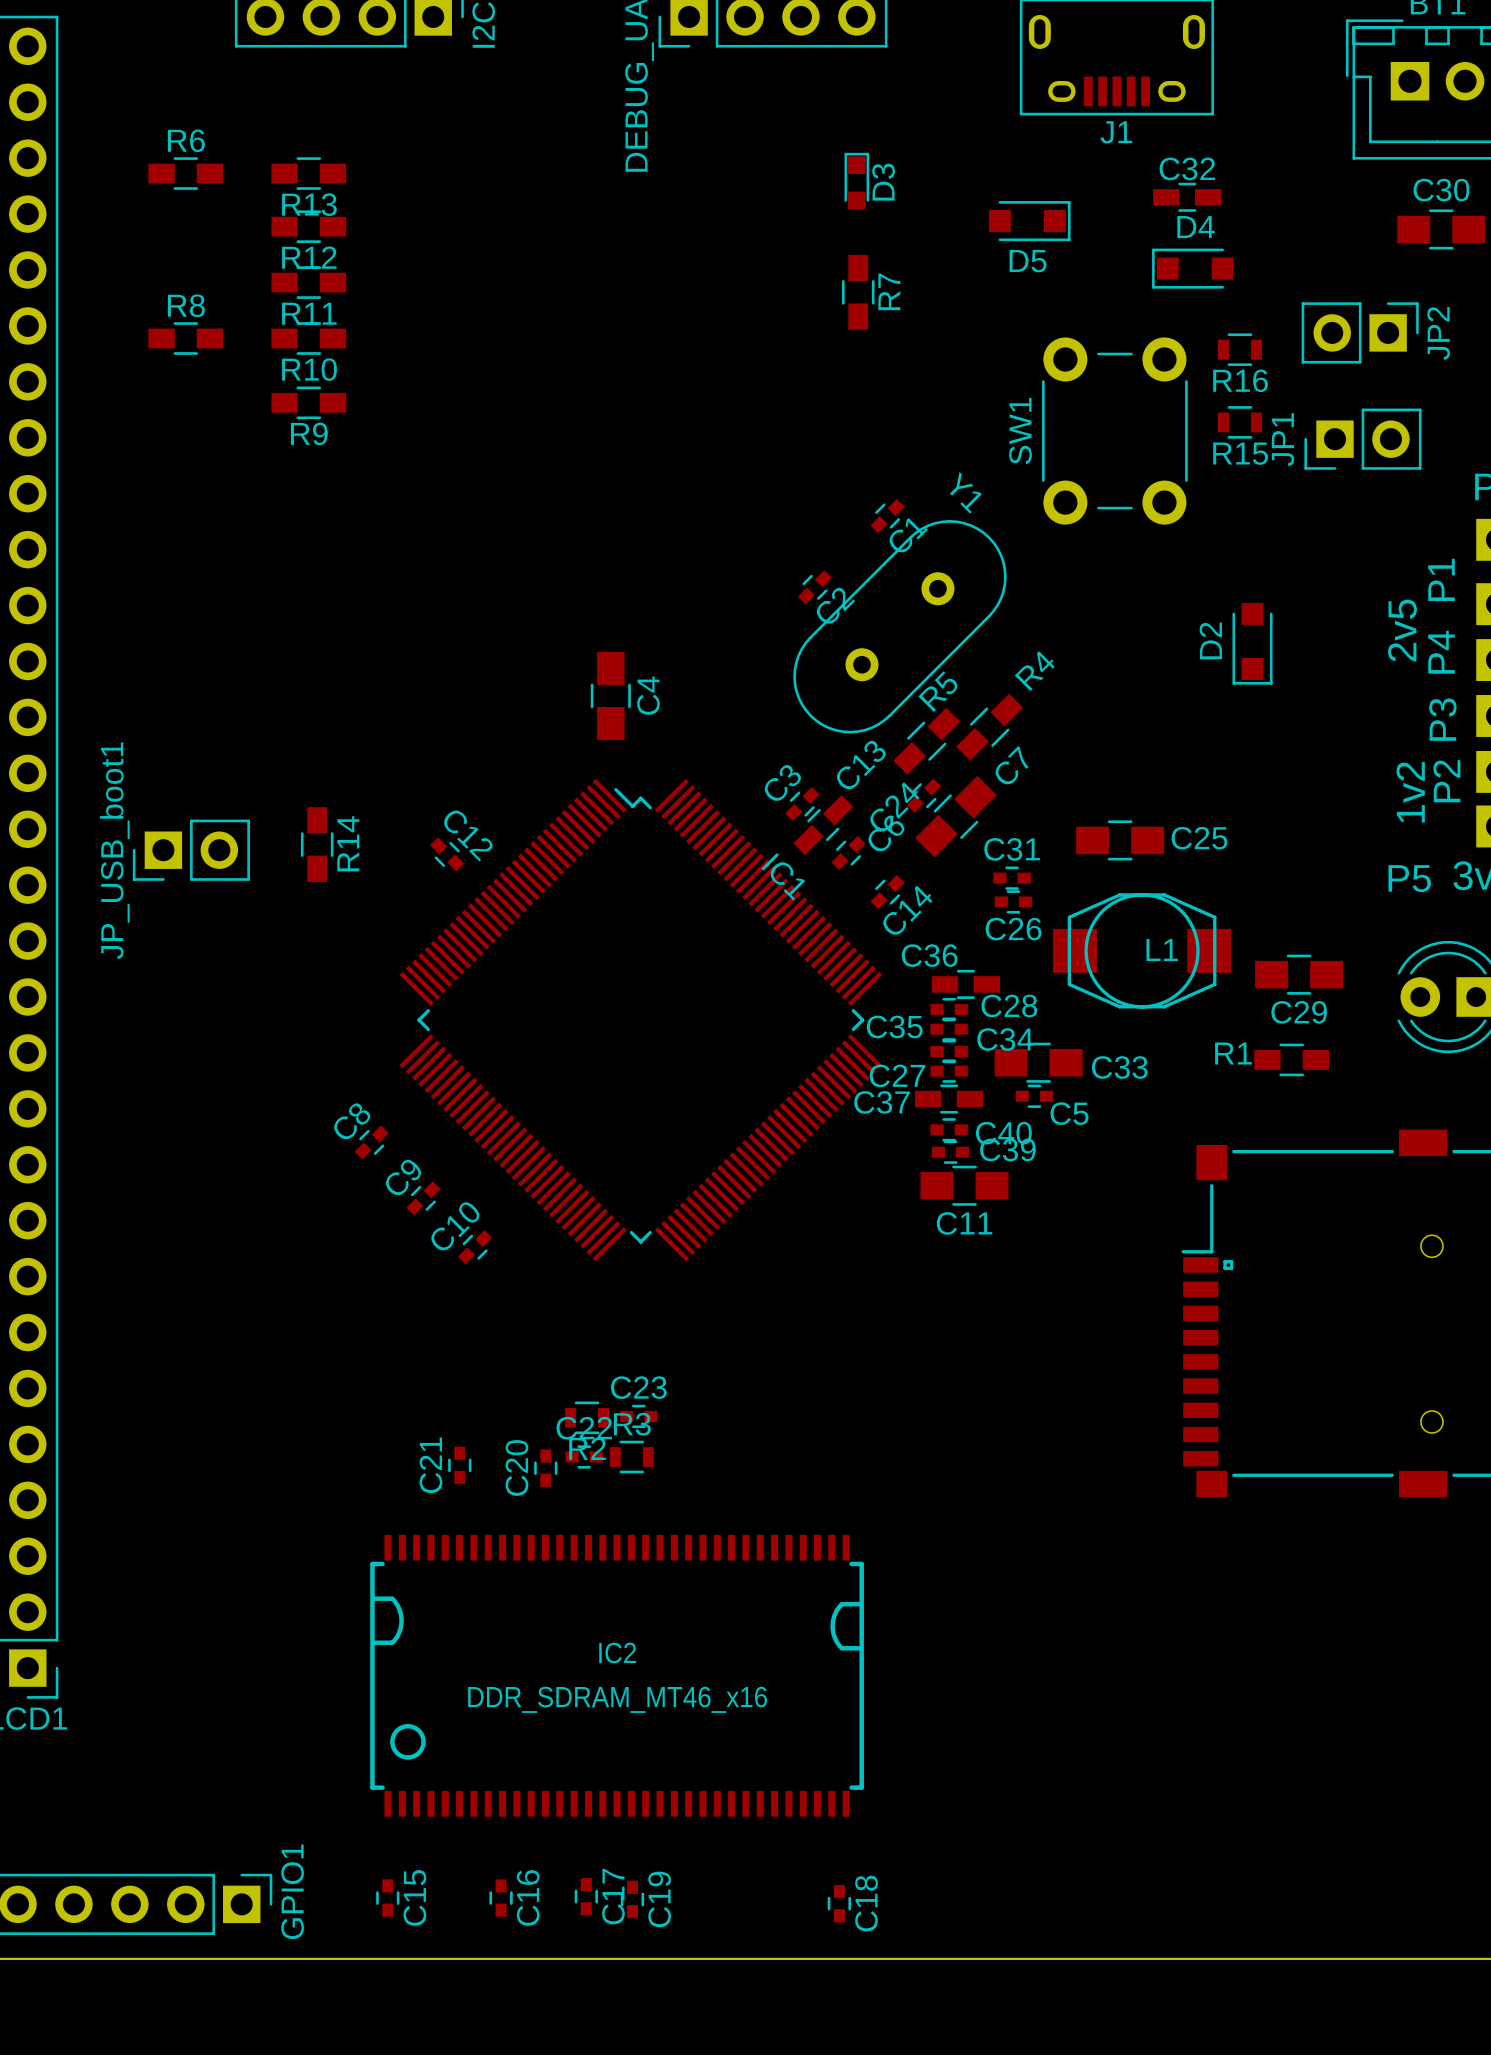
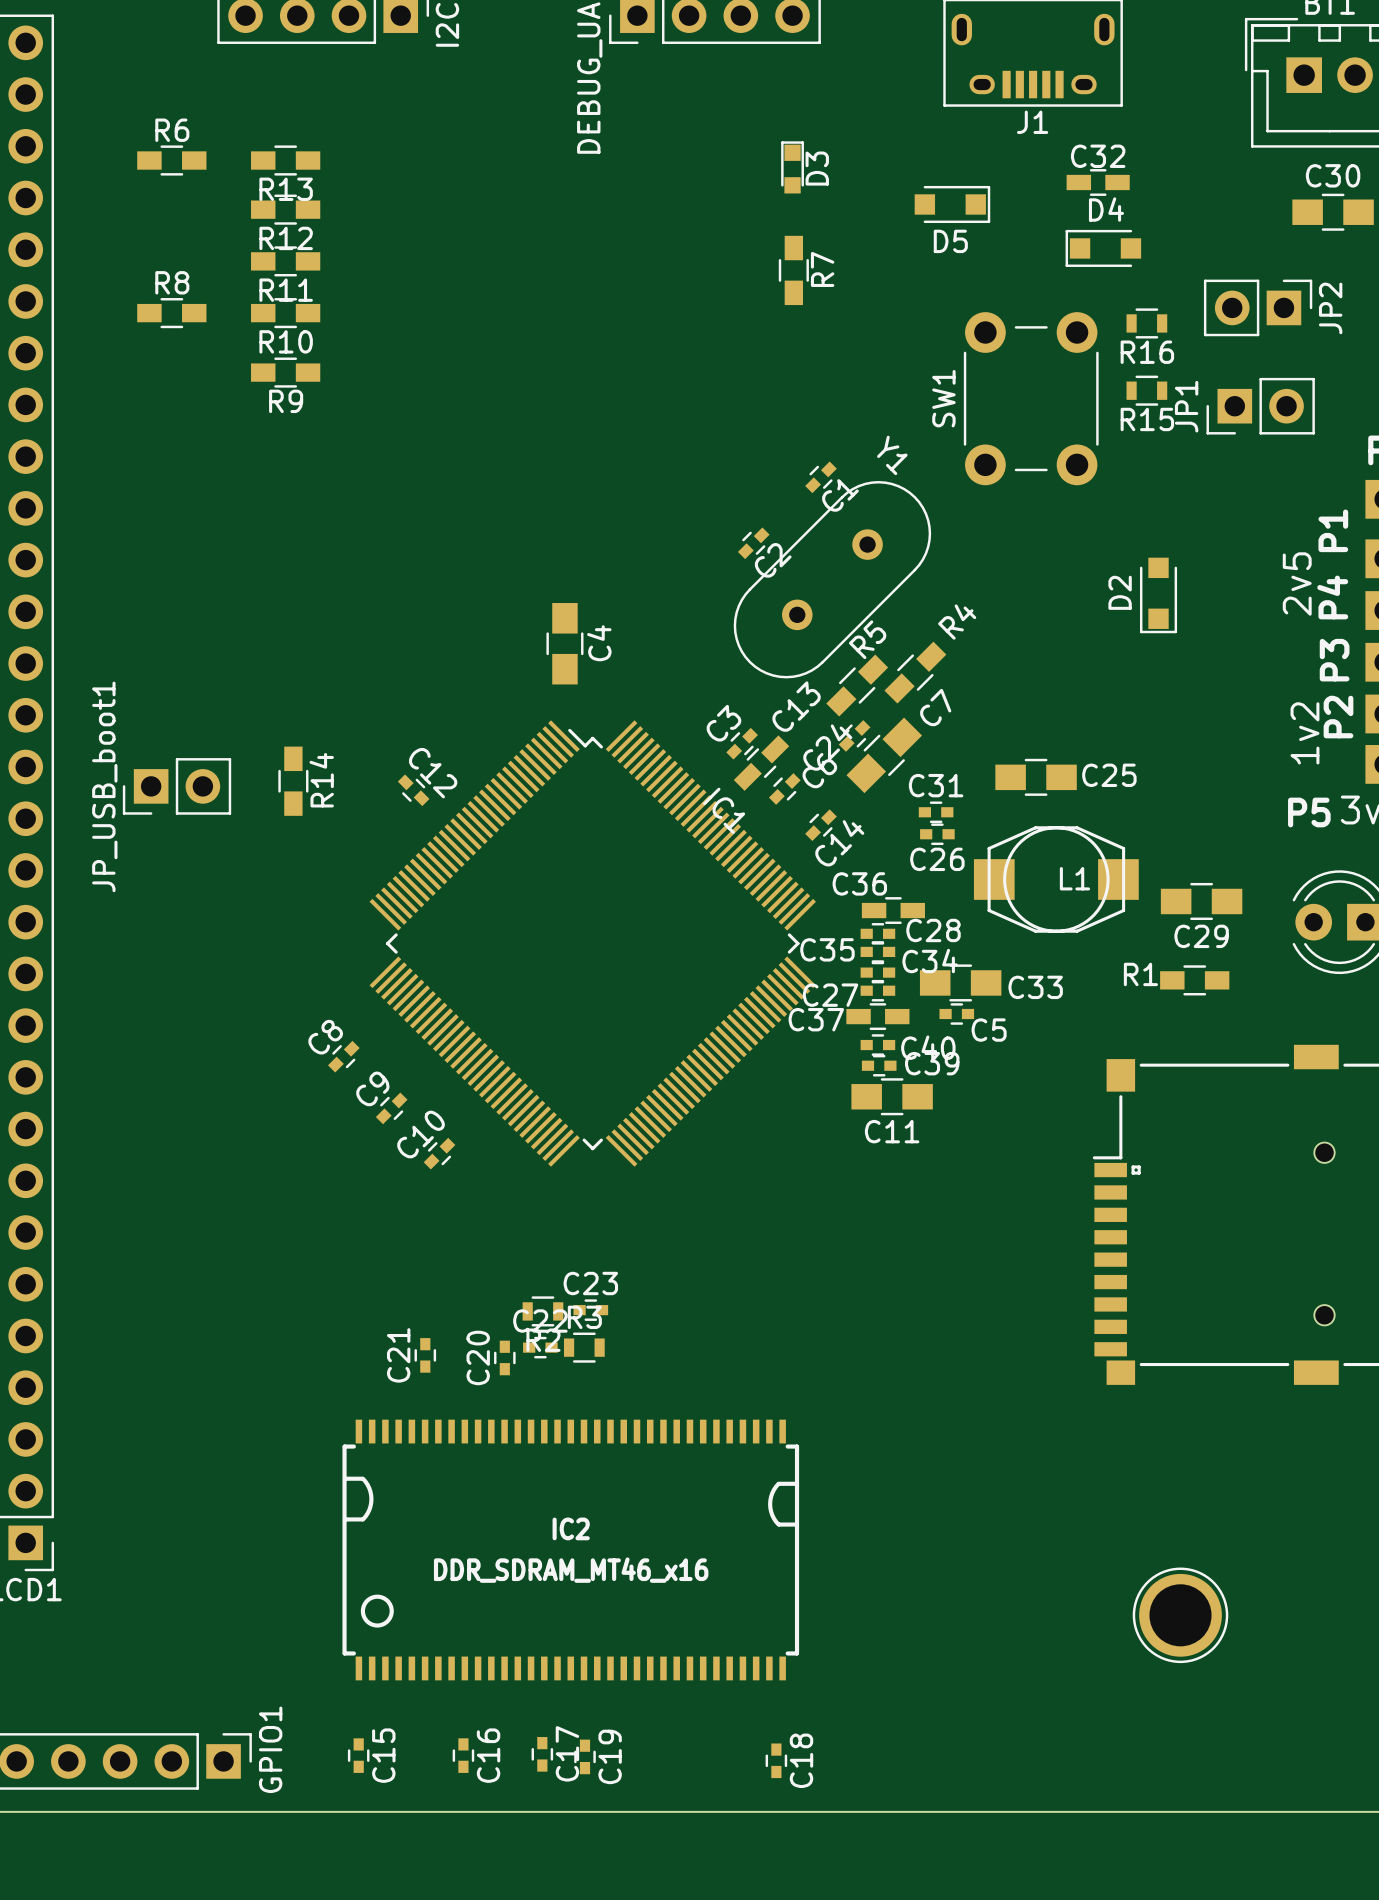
part: none -> (1180, 1615)

